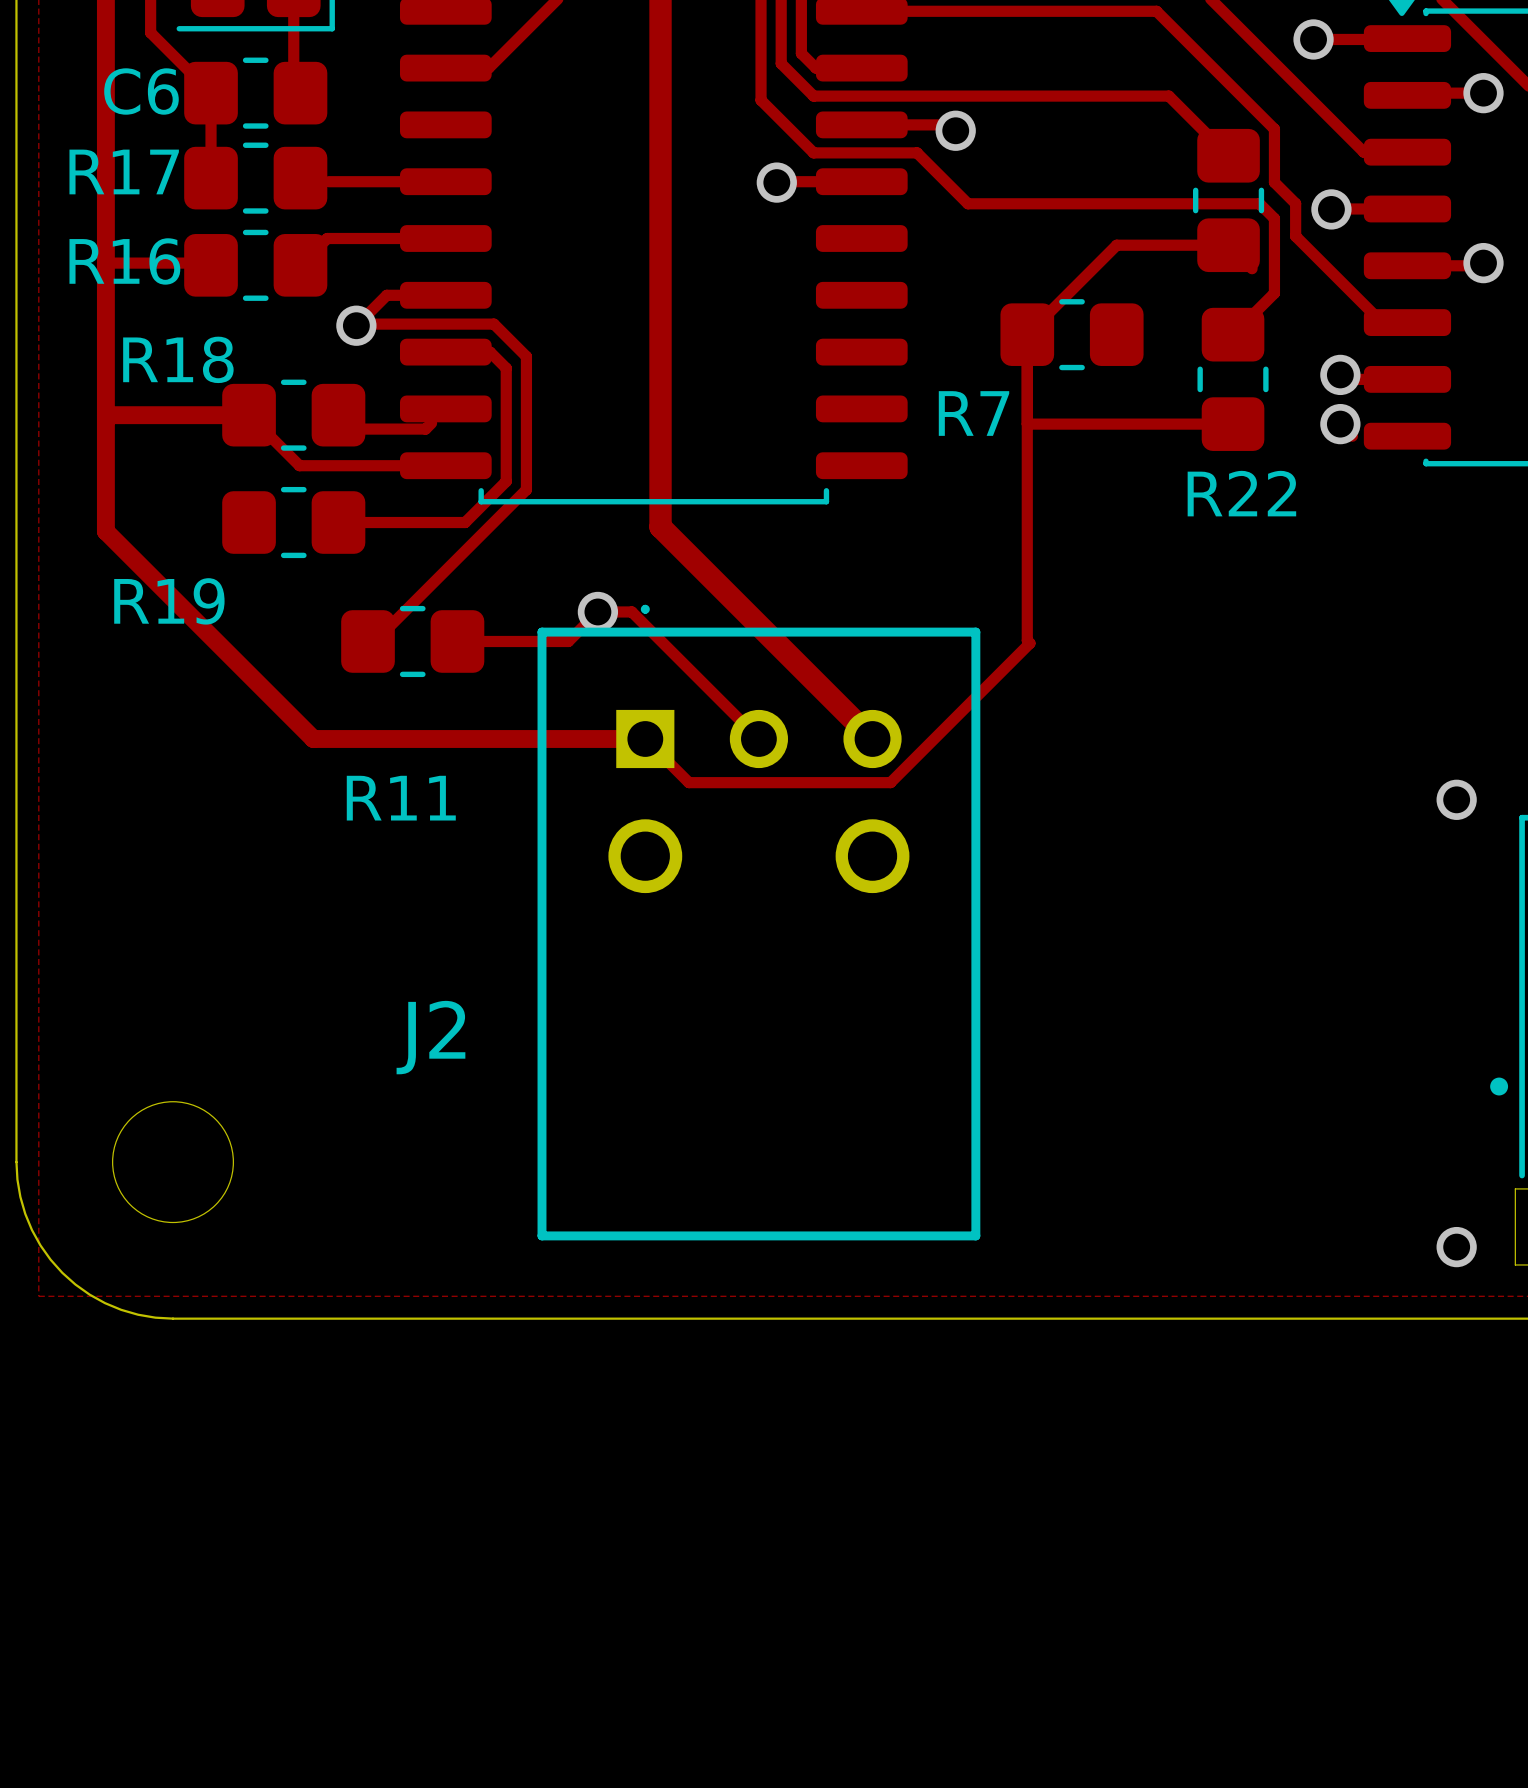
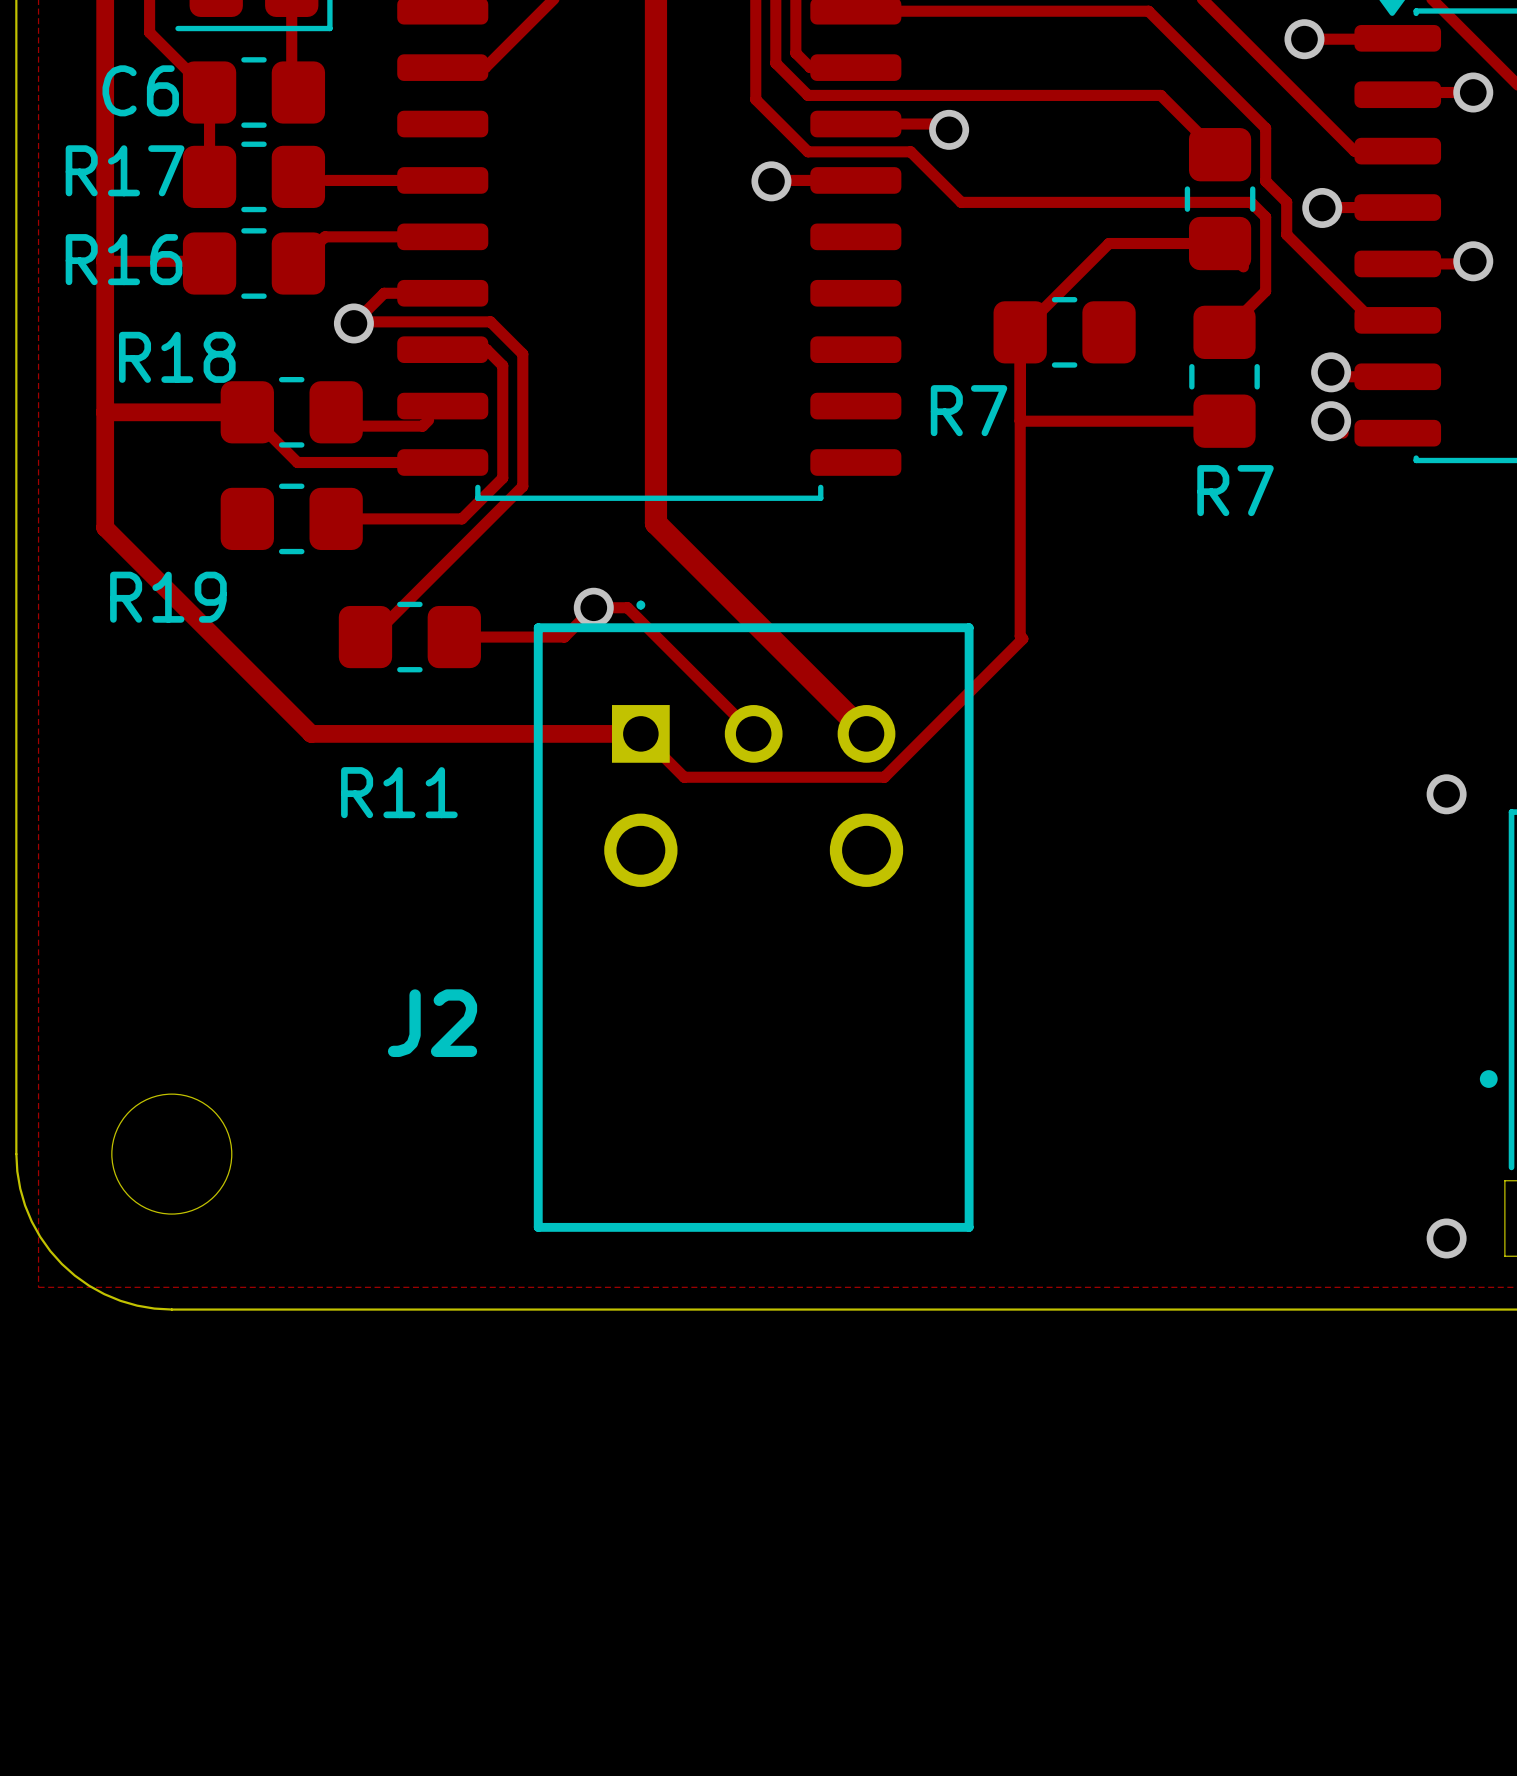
R22 name: R22 (1241, 493) -> R7 (1235, 490)

